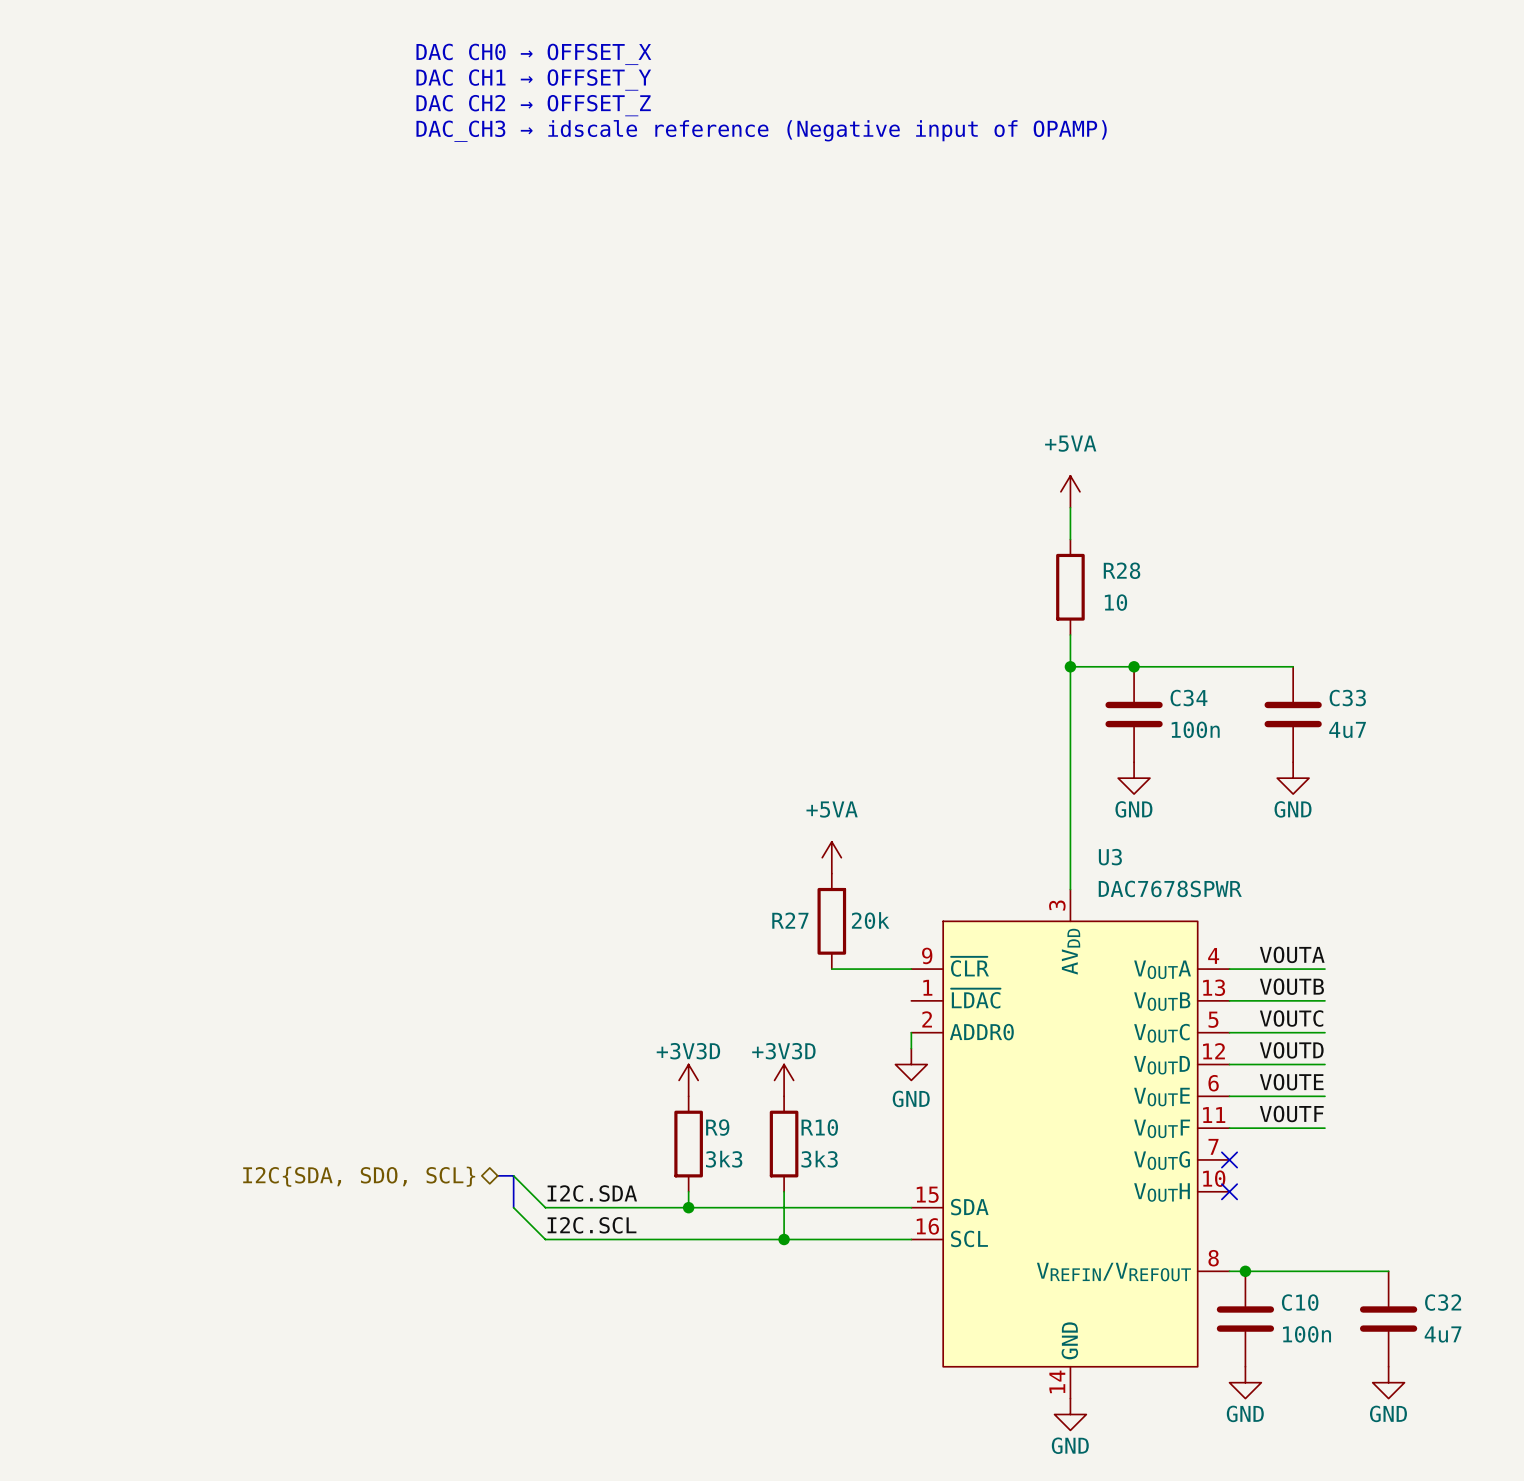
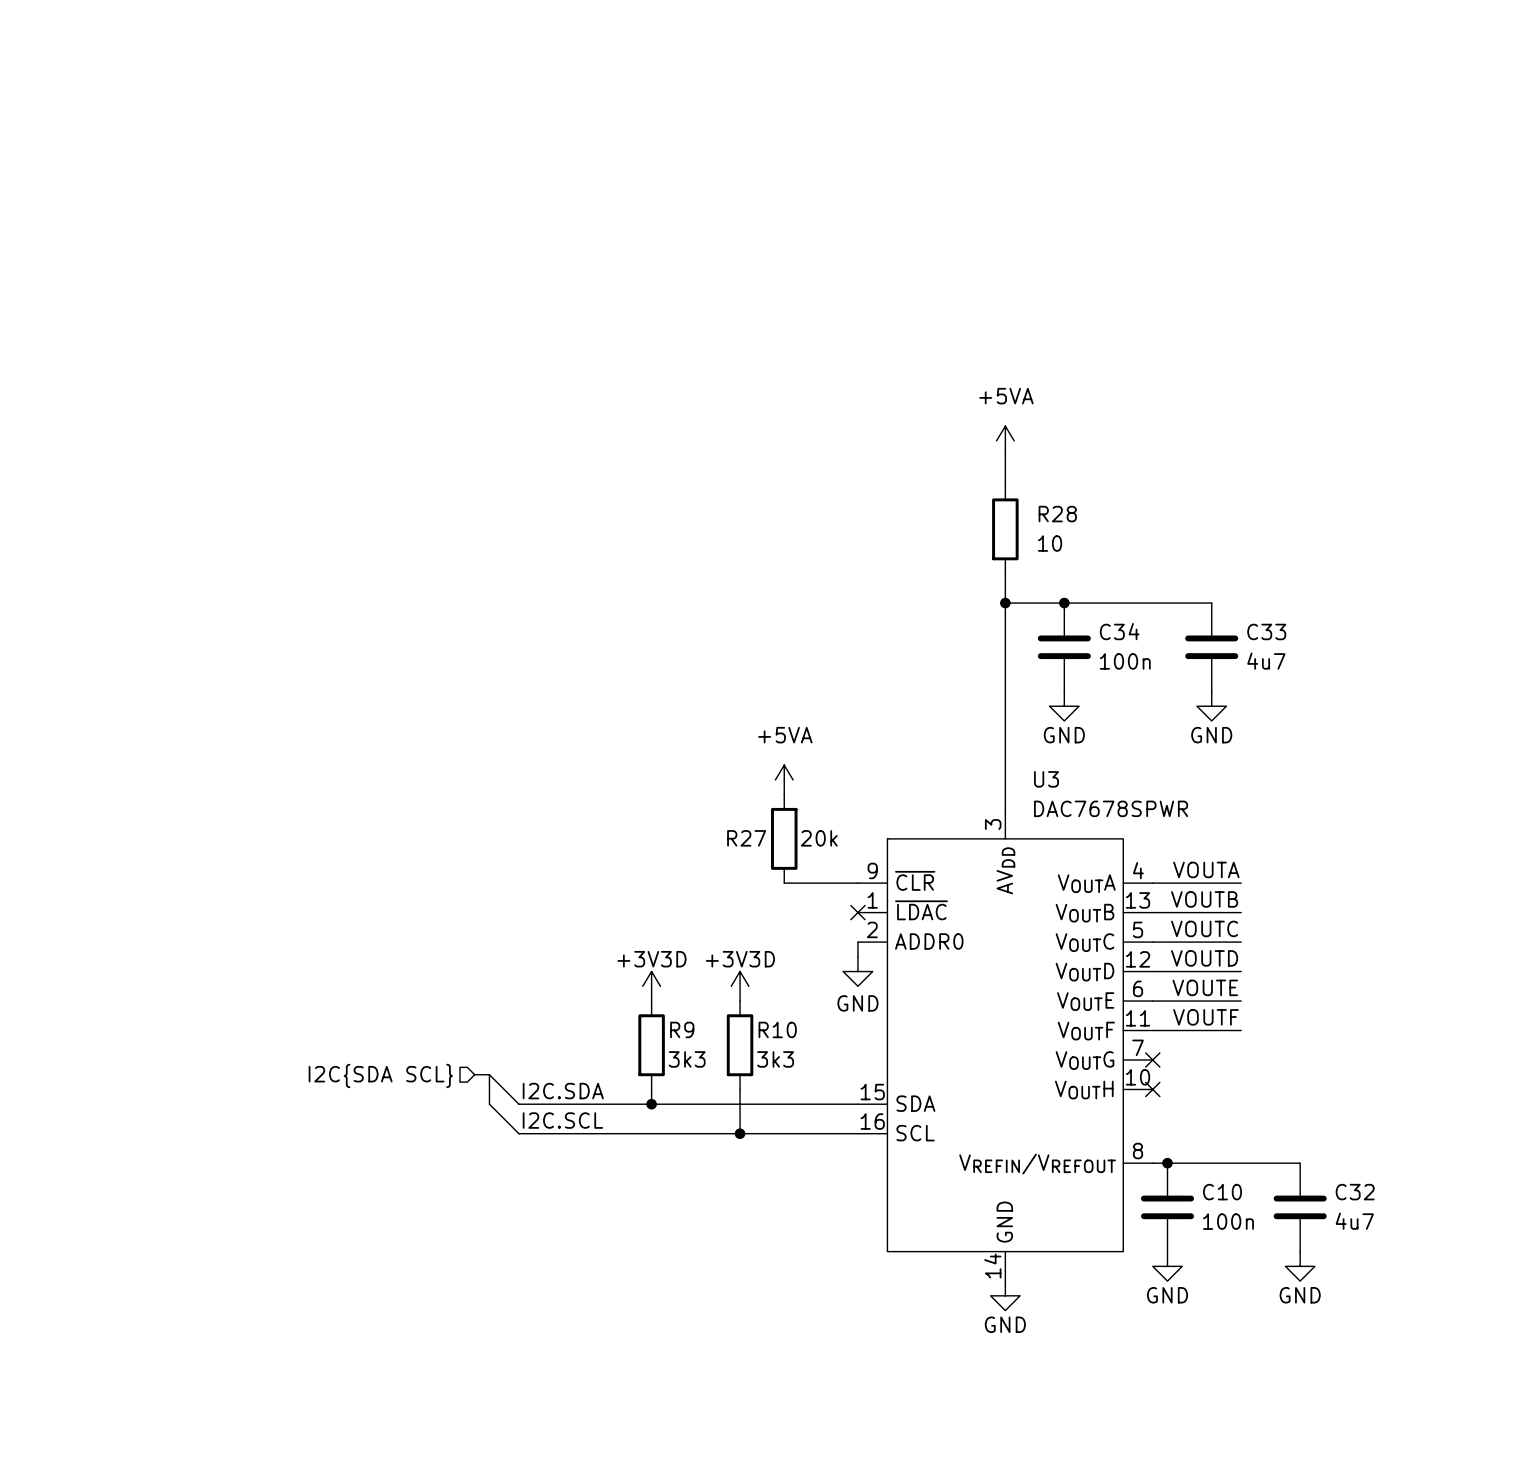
text: DAC CH0 → OFFSET_X (533, 54) -> none
text: DAC CH1 → OFFSET_Y (533, 79) -> none
text: DAC CH2 → OFFSET_Z (533, 105) -> none
text: DAC_CH3 → idscale reference (Negative input of OPAMP) (761, 130) -> none
no-connect mark: none -> (857, 912)
hierarchical label shape: bidirectional (359, 1176) -> input (380, 1075)
hierarchical label: I2C{SDA, SDO, SCL} (359, 1176) -> I2C{SDA SCL} (380, 1075)

